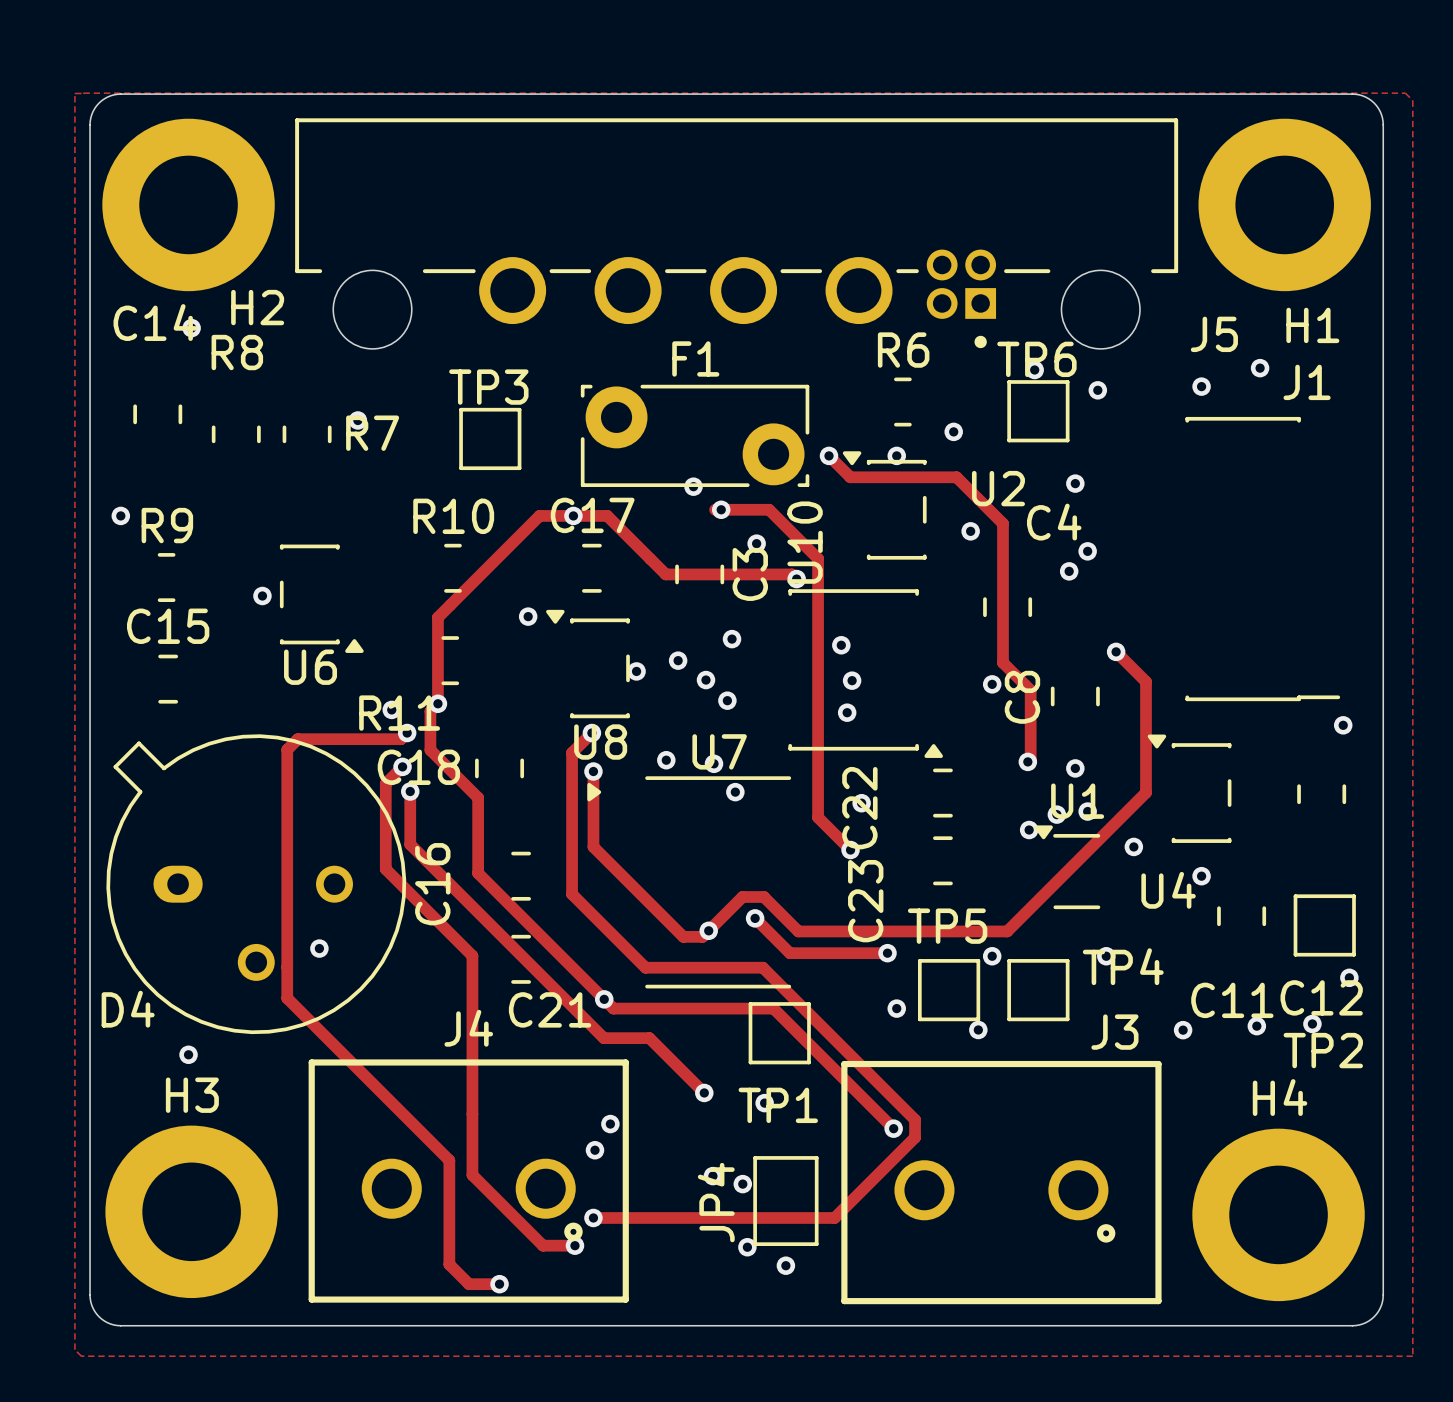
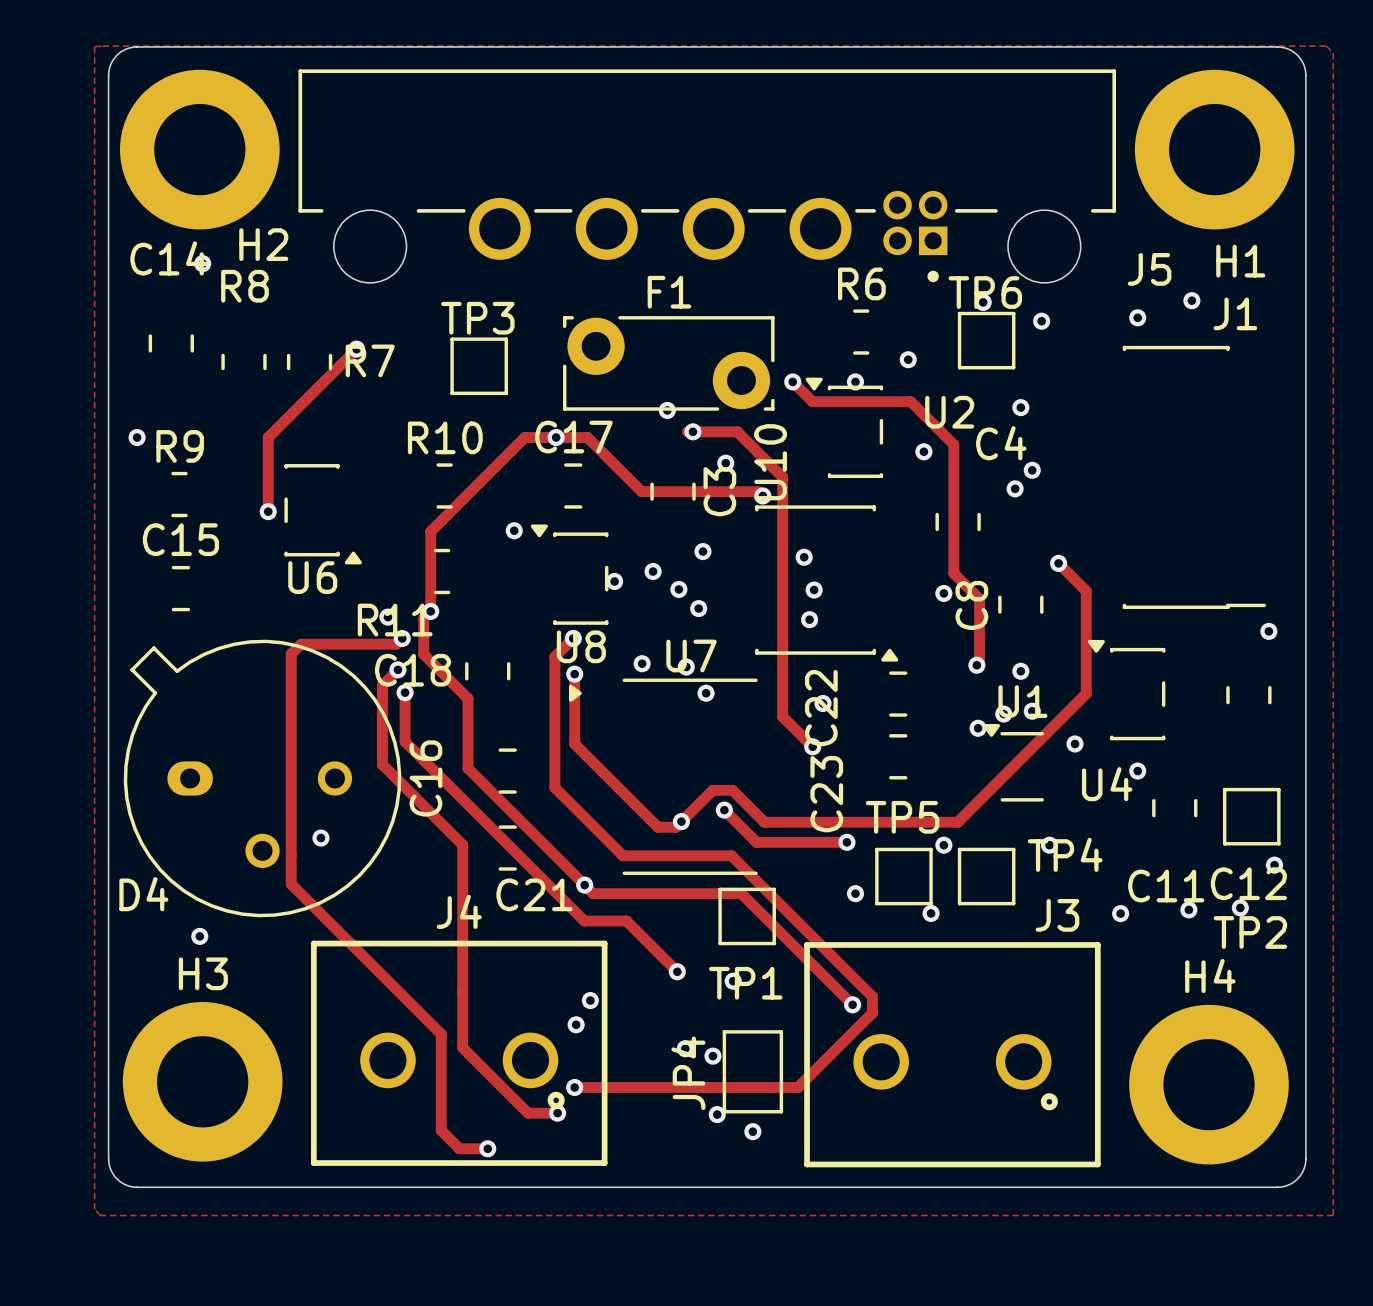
track: none -> (356, 349) (268, 437) (268, 511)

